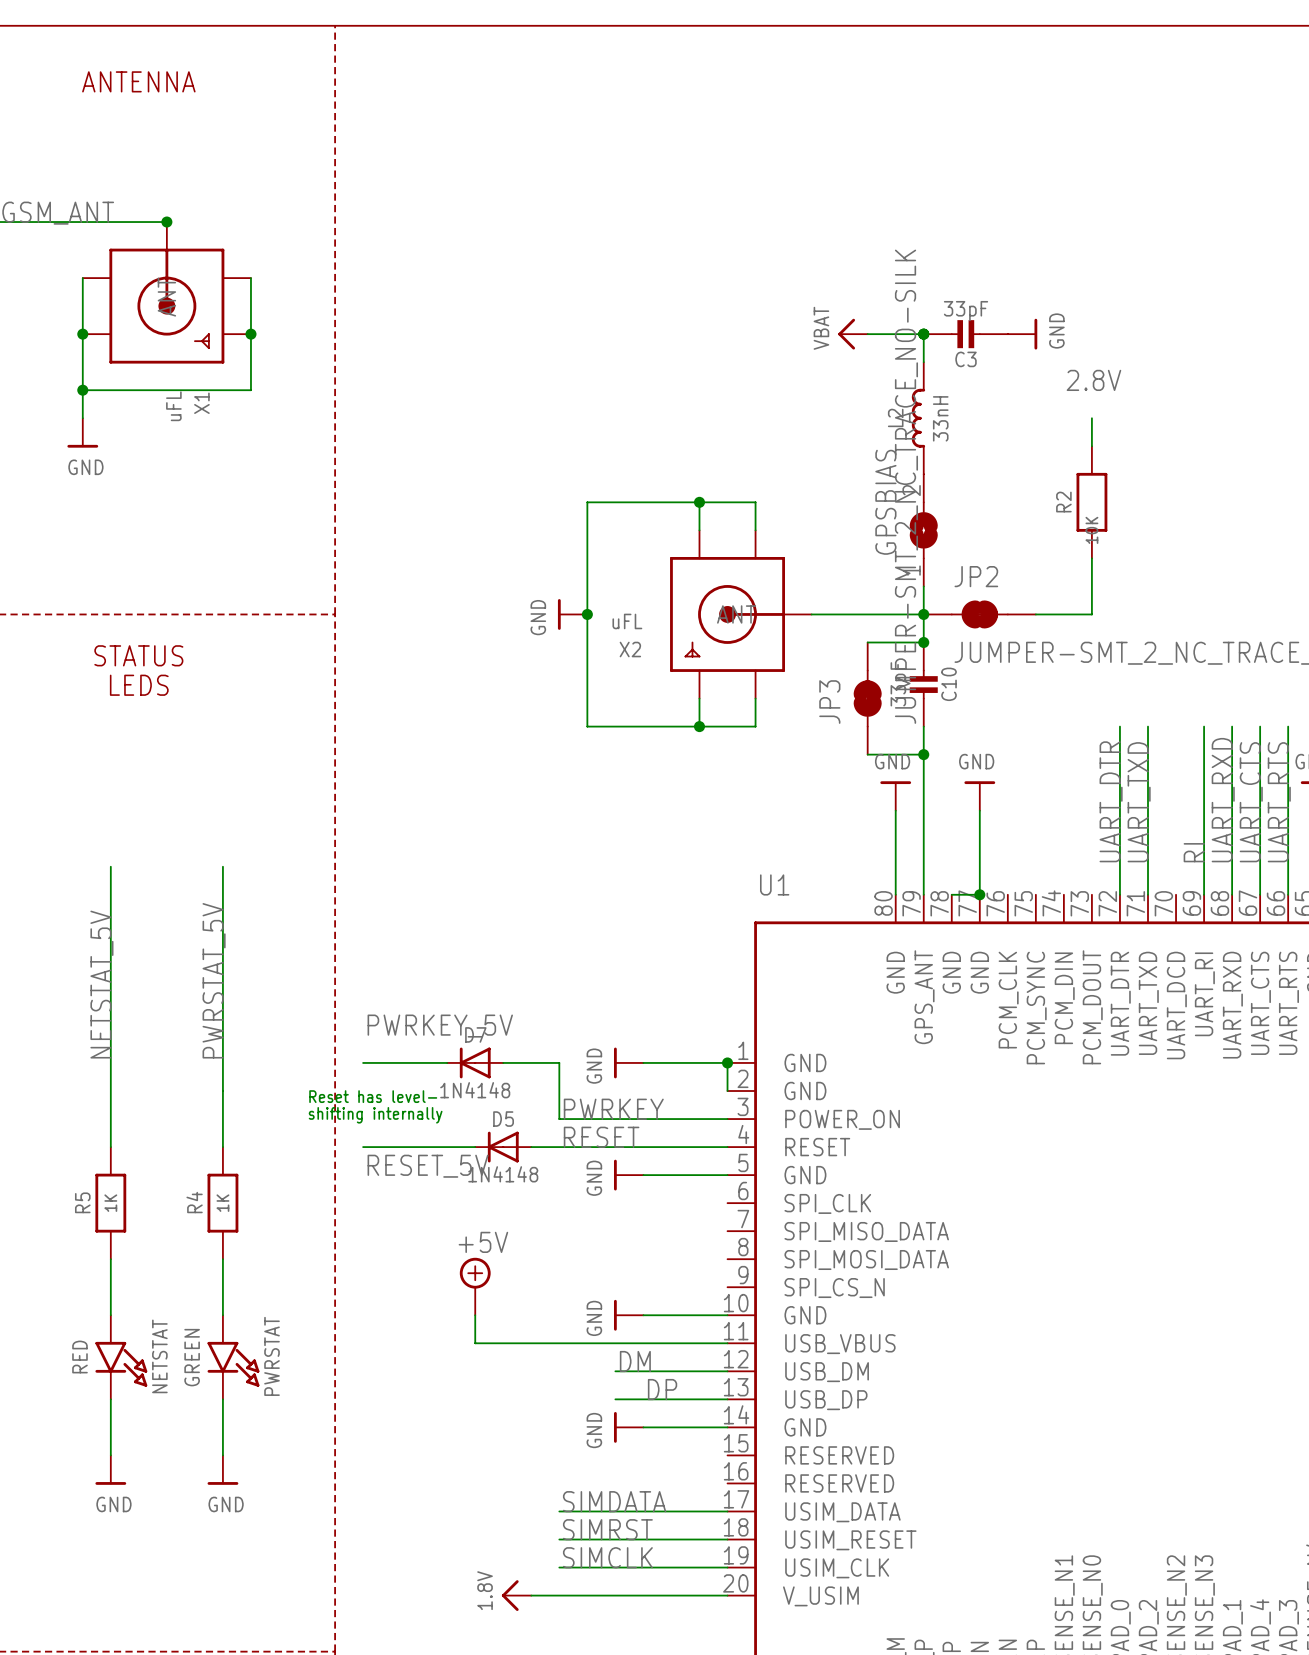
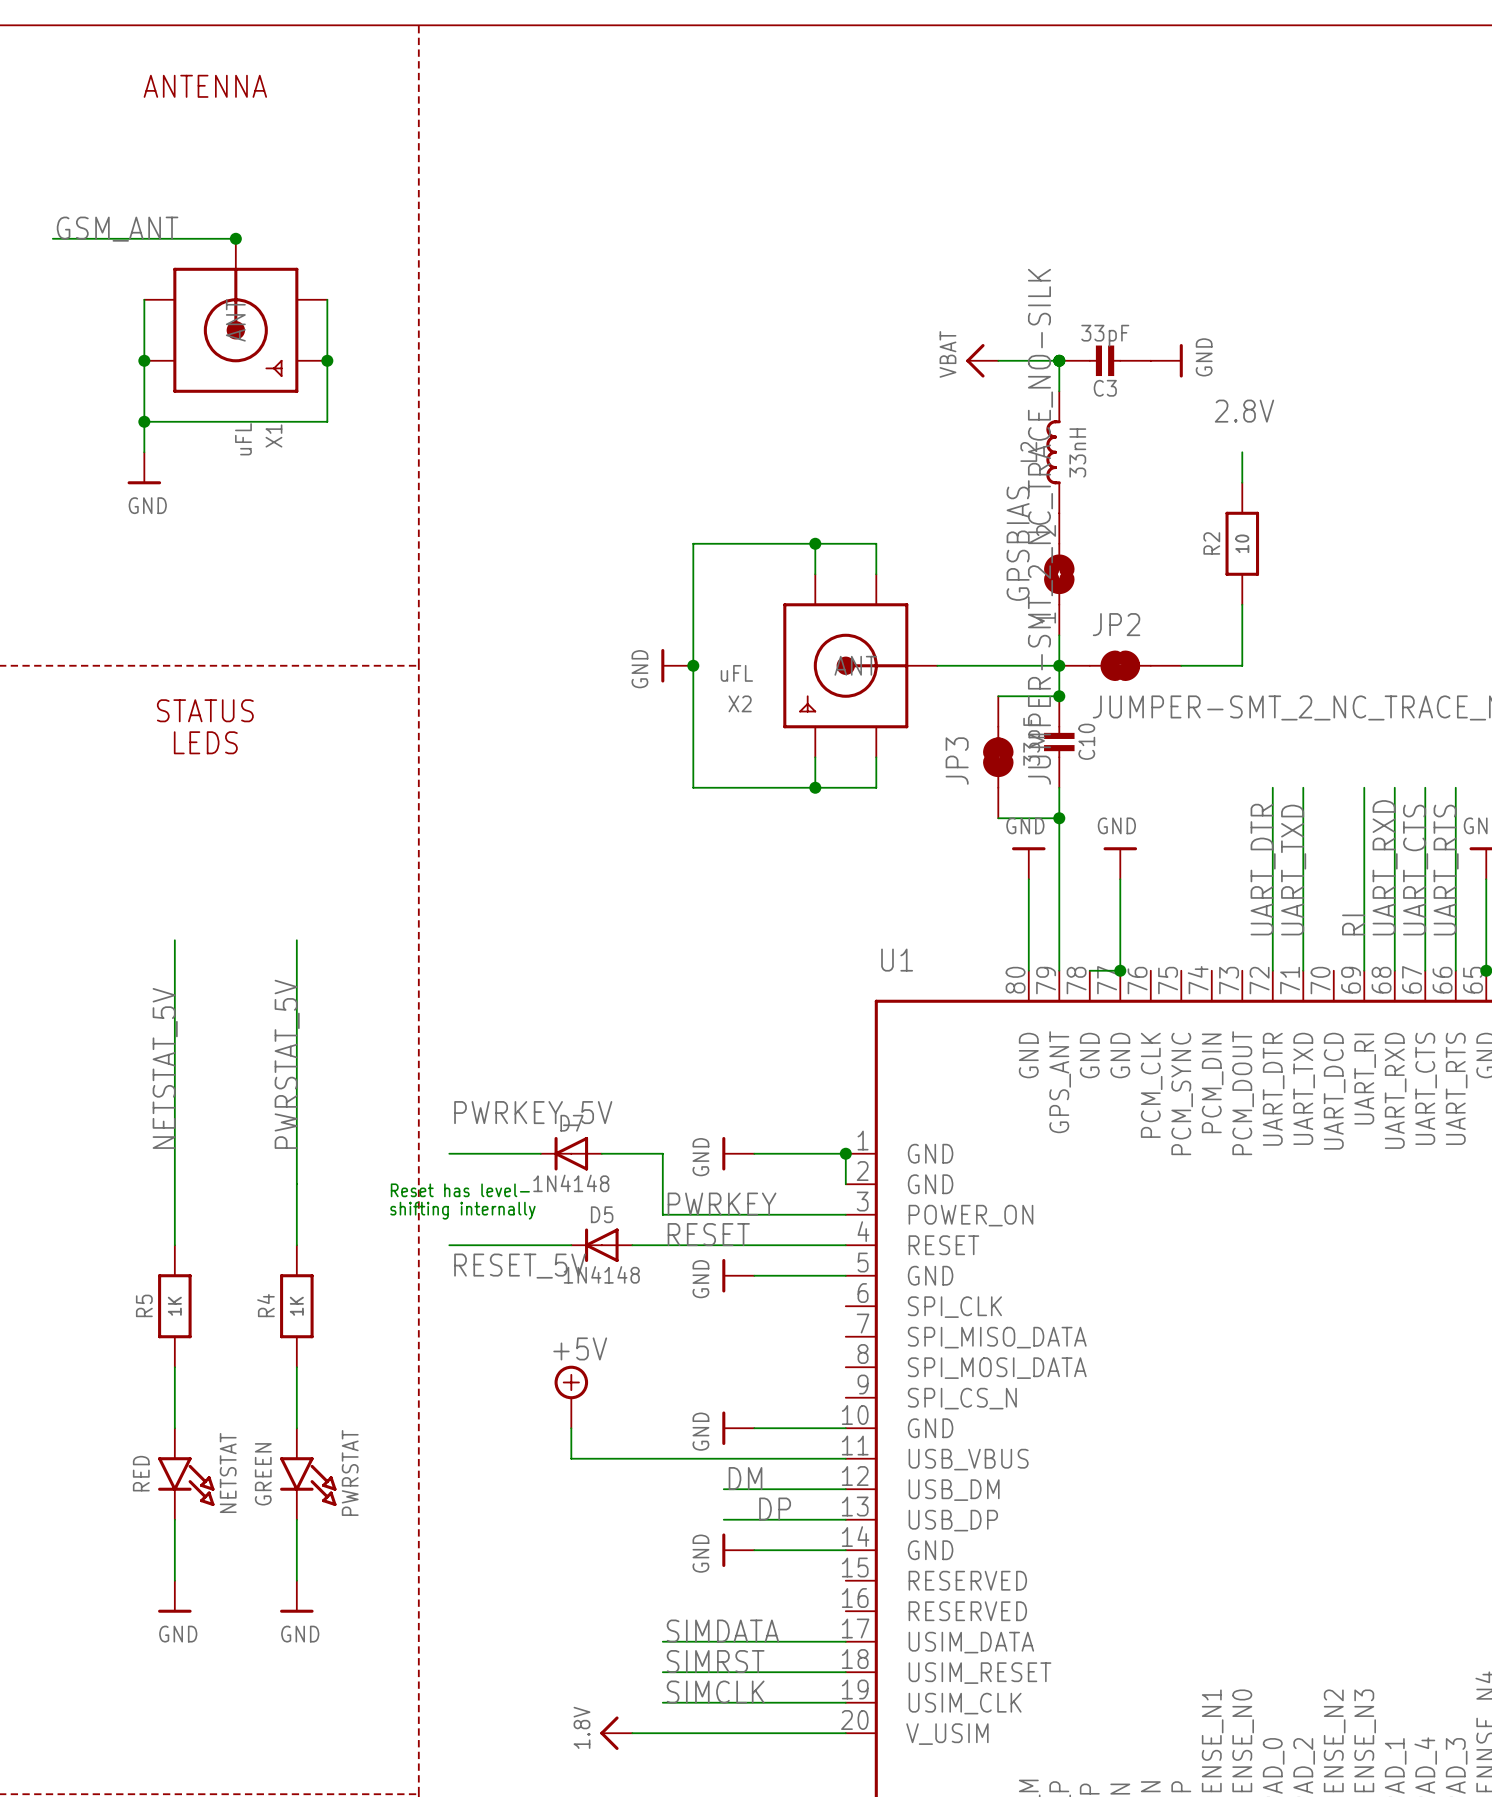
R2 value: 10K (1091, 530) -> 10 (1242, 543)

